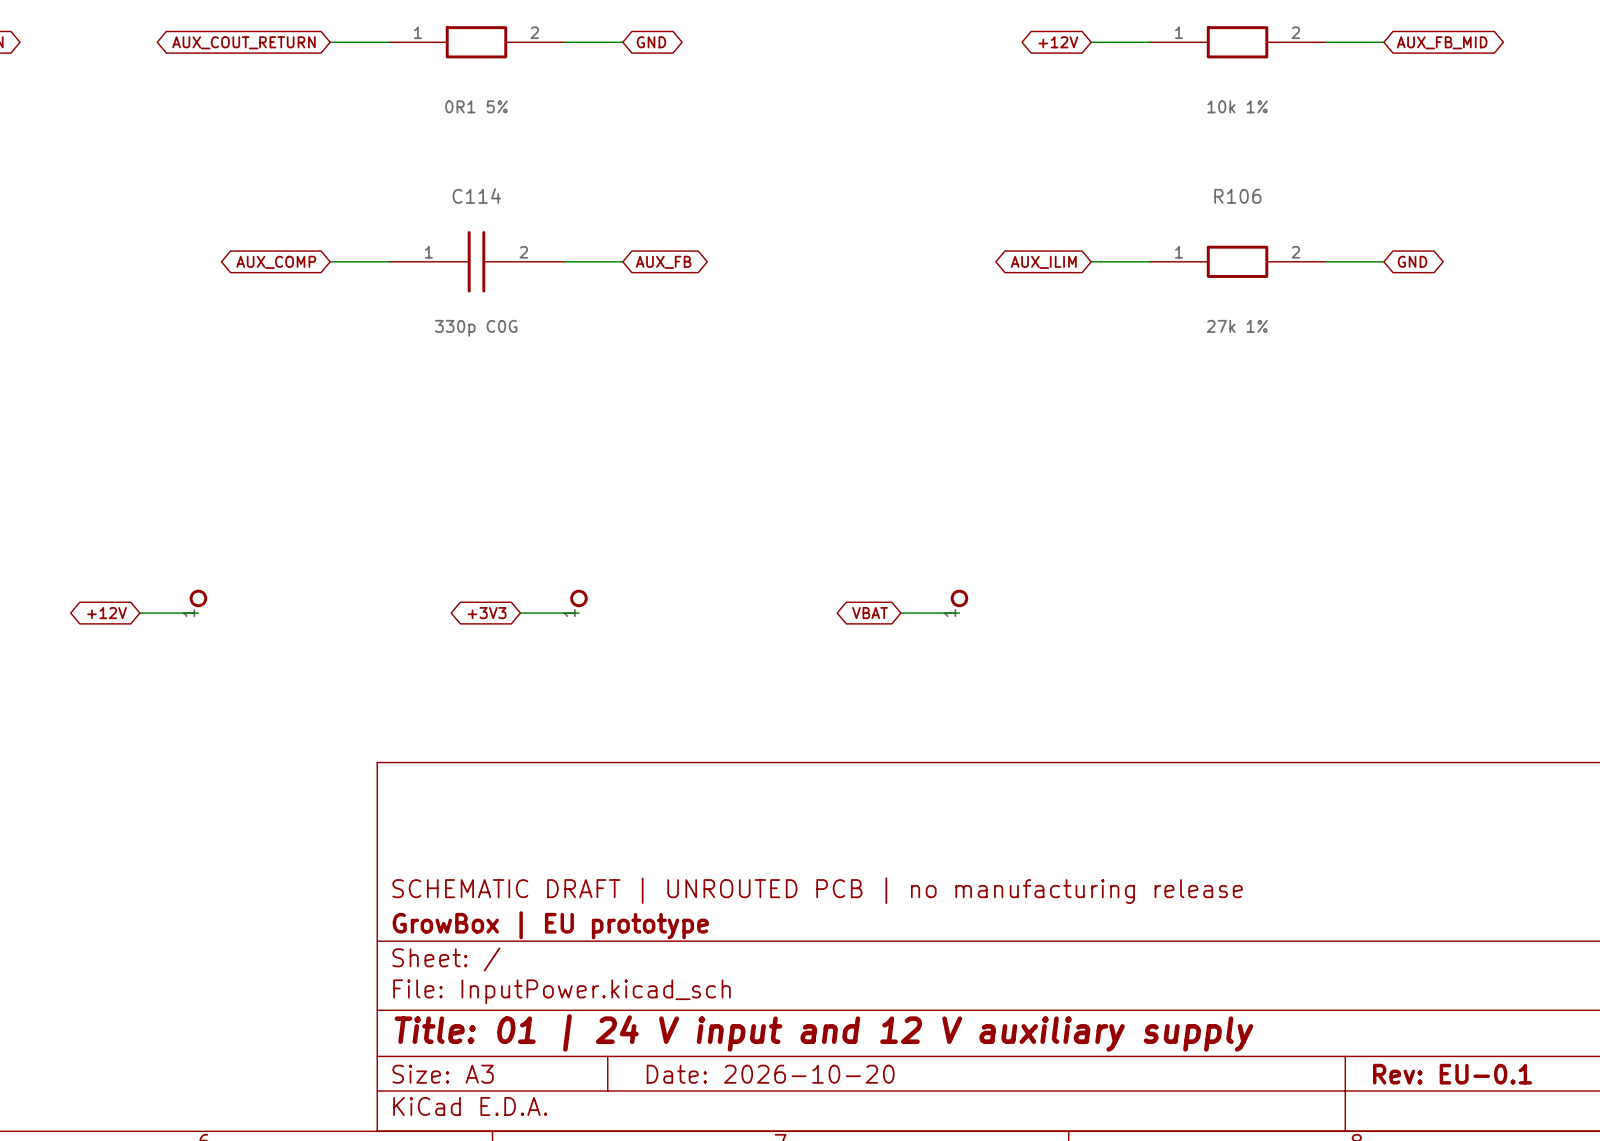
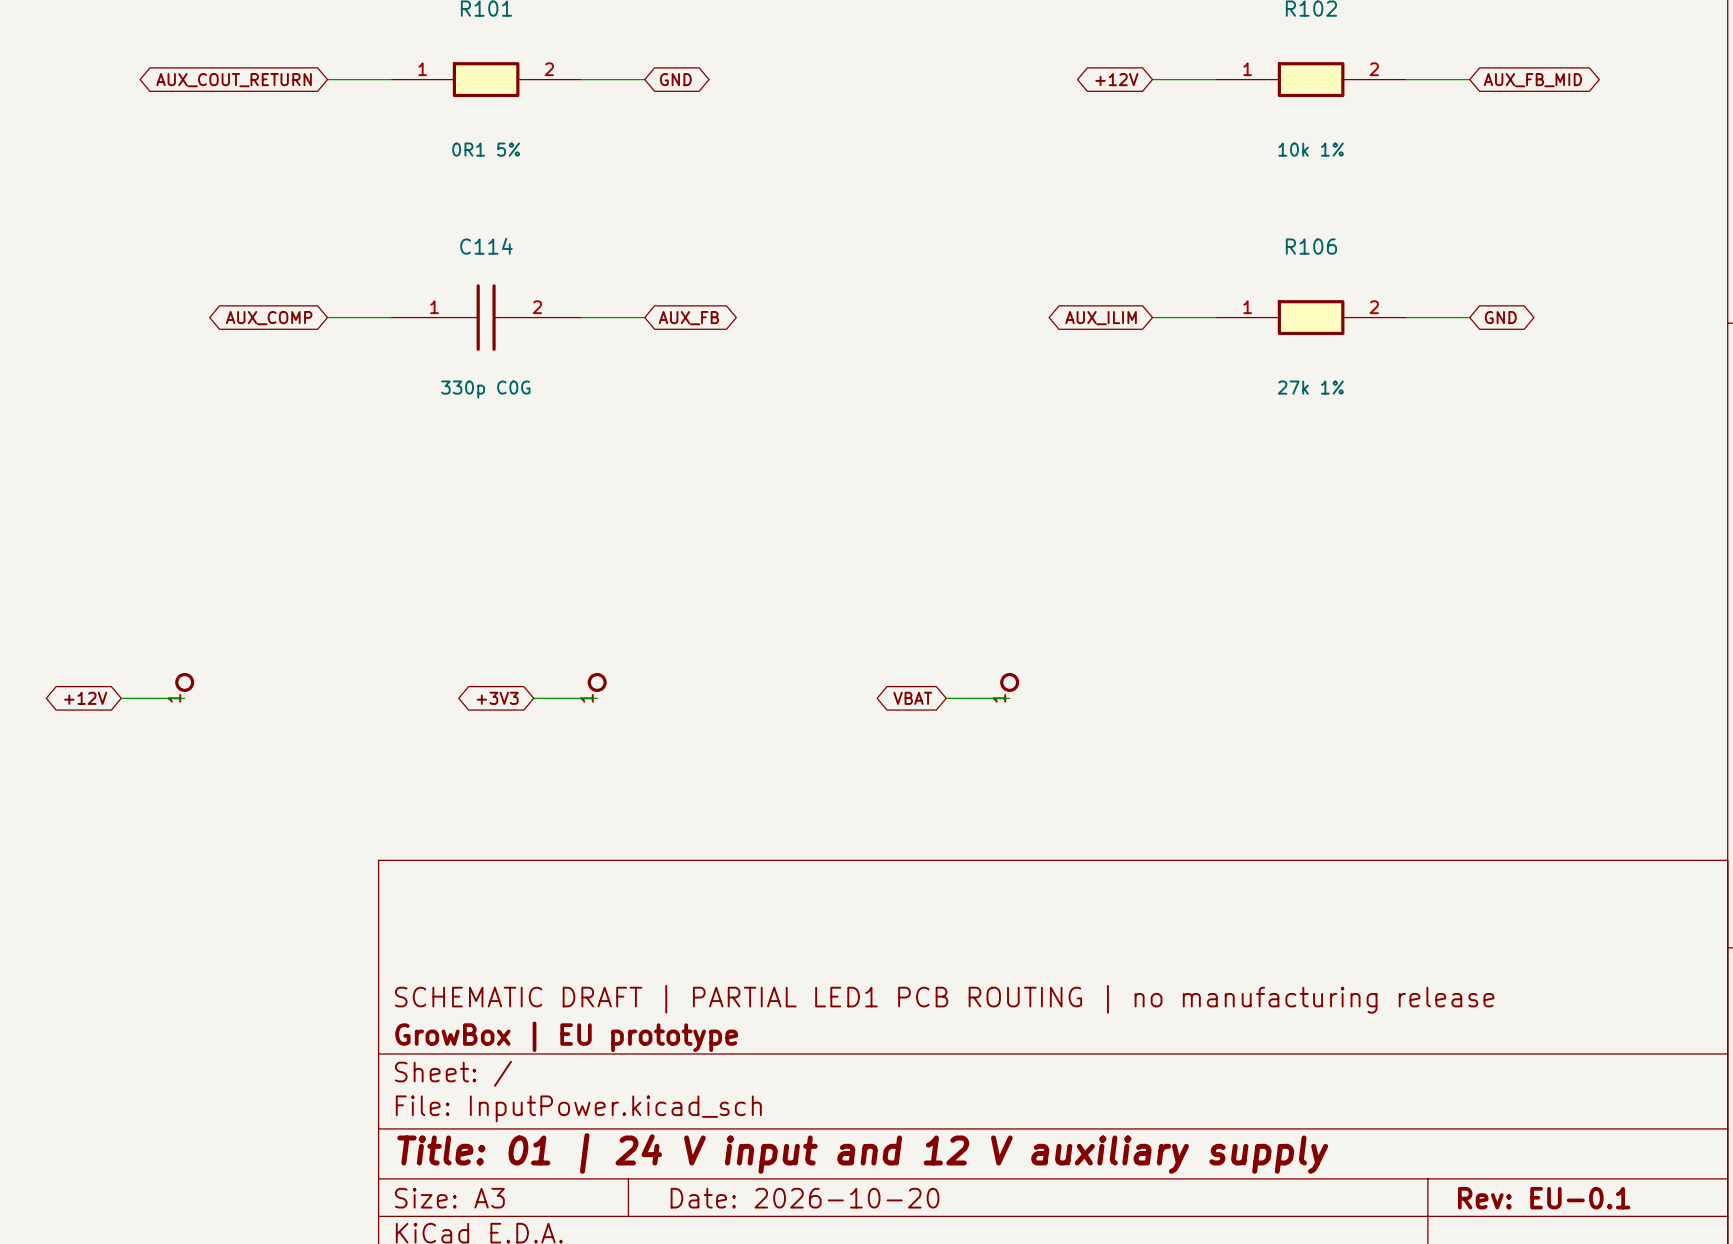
title block: SCHEMATIC DRAFT | UNROUTED PCB | no manufacturing release (817, 890) -> SCHEMATIC DRAFT | PARTIAL LED1 PCB ROUTING | no manufacturing release (944, 999)

